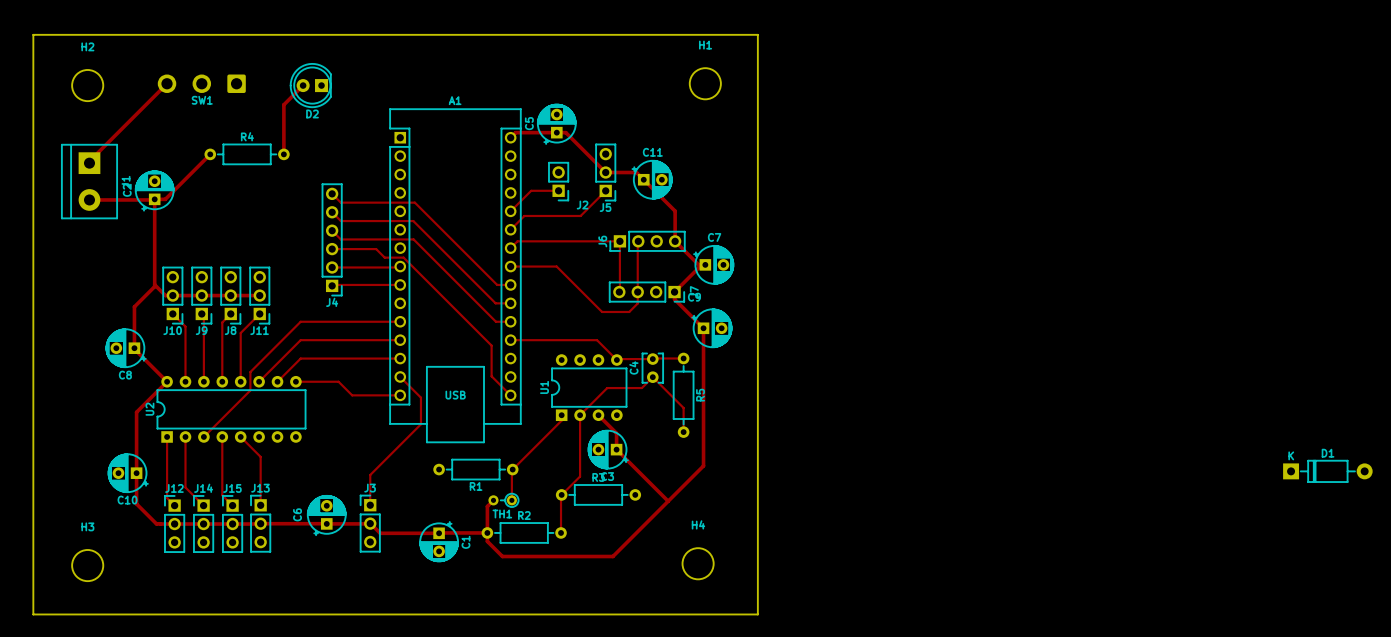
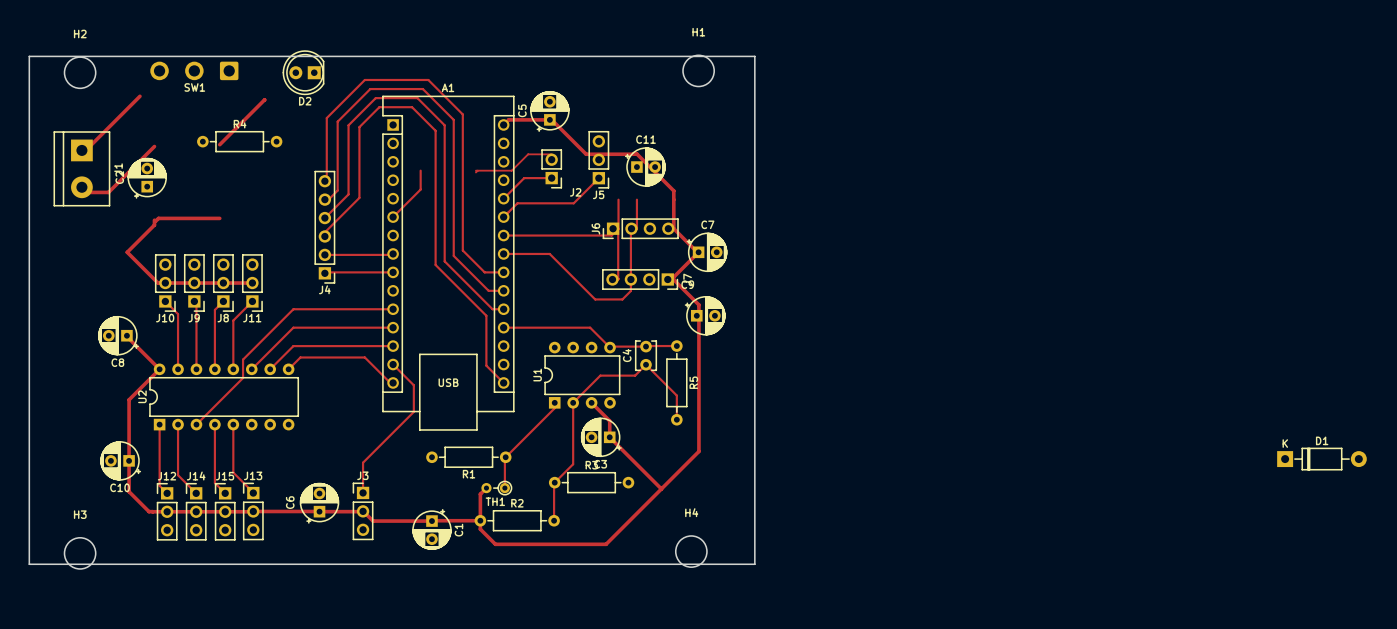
board edge: (33, 34) (757, 34) (757, 614) (33, 614) (33, 34) -> (29, 56) (29, 564) (754, 564) (754, 56) (29, 56)
track: (167, 83) (89, 163) -> none
track: (303, 85) (283, 104) (283, 154) -> none
track: none -> (139, 96) (83, 152) (83, 156)
track: none -> (264, 99) (219, 144)
track: (558, 132) (565, 132) (605, 172) (636, 172) (675, 211) (675, 241) (698, 264) (701, 264) (674, 292) (674, 299) (703, 328) (703, 465) -> (698, 252) (673, 277) (698, 304) (698, 451) (696, 453)
track: none -> (551, 119) (586, 154) (636, 154) (673, 190) (673, 228) (697, 252)
track: (210, 154) (165, 199) (154, 199) -> none
track: none -> (154, 146) (108, 192) (83, 193)
track: none -> (551, 154) (528, 154) (511, 170) (475, 170)
track: none -> (420, 170) (420, 189) (393, 217)
track: none -> (477, 170) (475, 172)
track: (332, 193) (340, 202) (414, 202) (497, 284) -> (324, 181) (326, 179) (326, 118) (364, 79) (428, 79) (462, 114) (462, 250) (484, 272) (490, 272)
track: (154, 199) (154, 286) (134, 306) (134, 348) -> none
track: (154, 199) (89, 199) -> none
track: (332, 212) (340, 221) (413, 221) (460, 268) -> (324, 199) (328, 199) (337, 190) (337, 121) (370, 89) (422, 89) (453, 119) (453, 255)
track: none -> (636, 199) (636, 229)
track: (332, 230) (340, 239) (413, 239) (495, 321) (499, 321) -> (324, 218) (348, 194) (348, 125) (375, 98) (417, 98) (444, 125) (444, 261) (492, 309)
track: none -> (219, 218) (158, 218) (155, 221)
track: none -> (154, 220) (154, 225) (127, 252) (147, 272)
track: none -> (618, 229) (618, 278)
track: (510, 248) (517, 241) (619, 241) (619, 292) -> (503, 235) (611, 235) (618, 228) (618, 199)
track: (332, 249) (376, 249) (384, 257) (403, 257) (491, 345) (491, 376) (493, 378) -> (324, 236) (324, 232) (359, 197) (359, 127) (379, 107) (412, 107) (435, 130) (435, 264) (486, 315) (486, 365)
track: (295, 381) (338, 381) (352, 395) (397, 395) -> (288, 369) (300, 357) (364, 357) (390, 382)
track: (240, 436) (260, 456) (260, 504) -> (233, 424) (233, 472) (253, 492)

